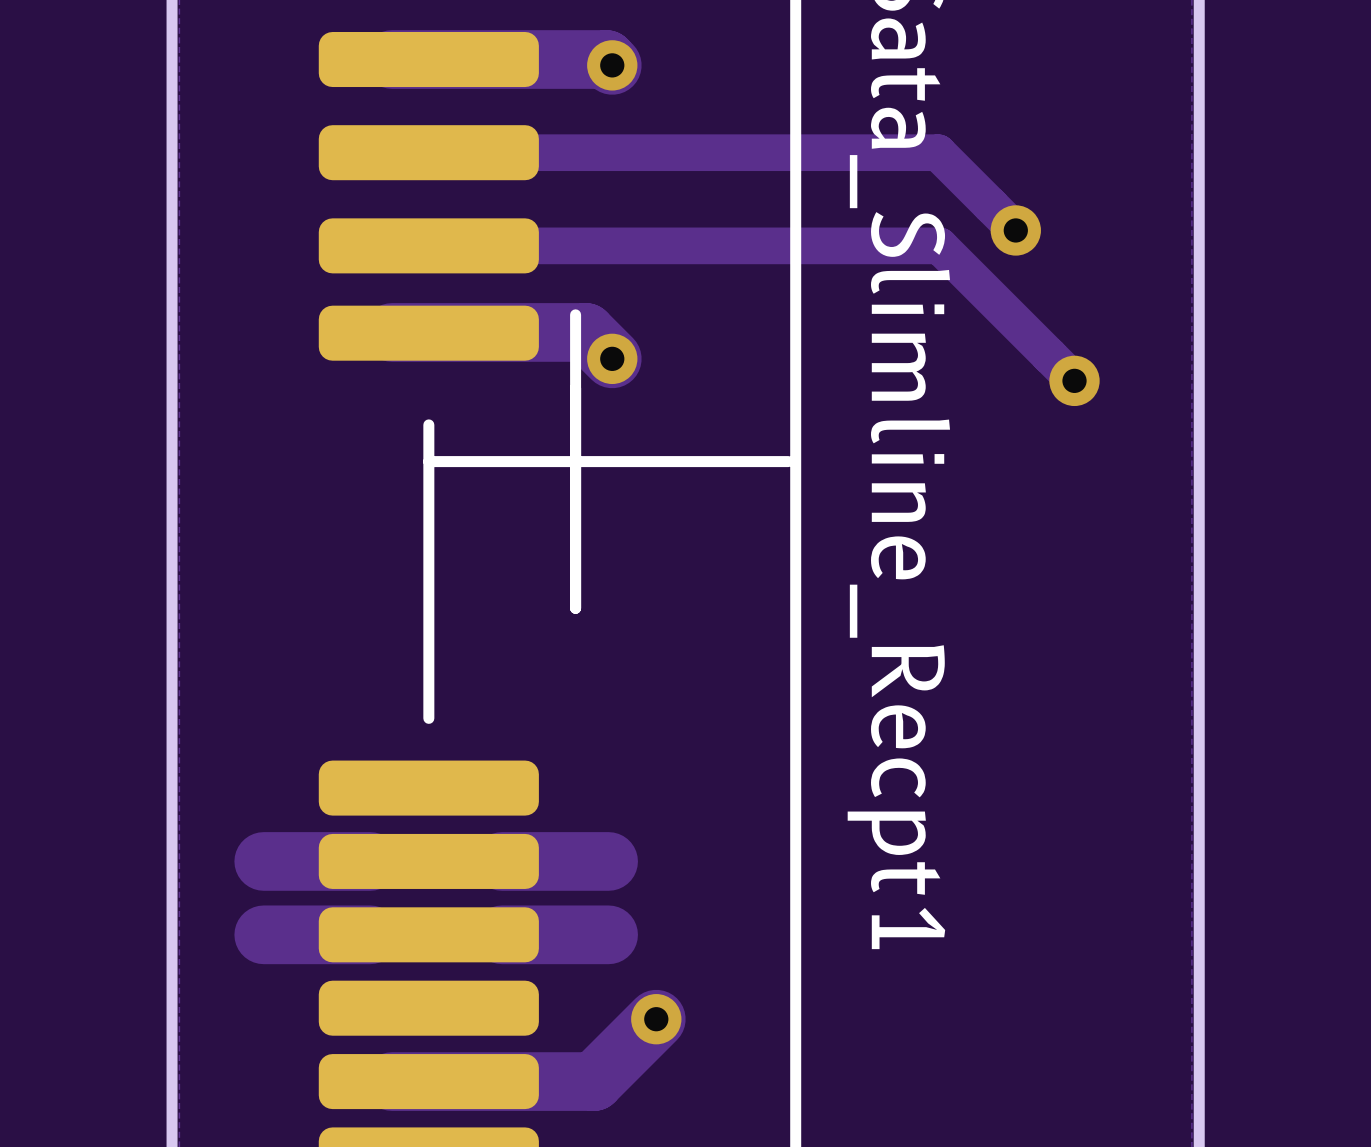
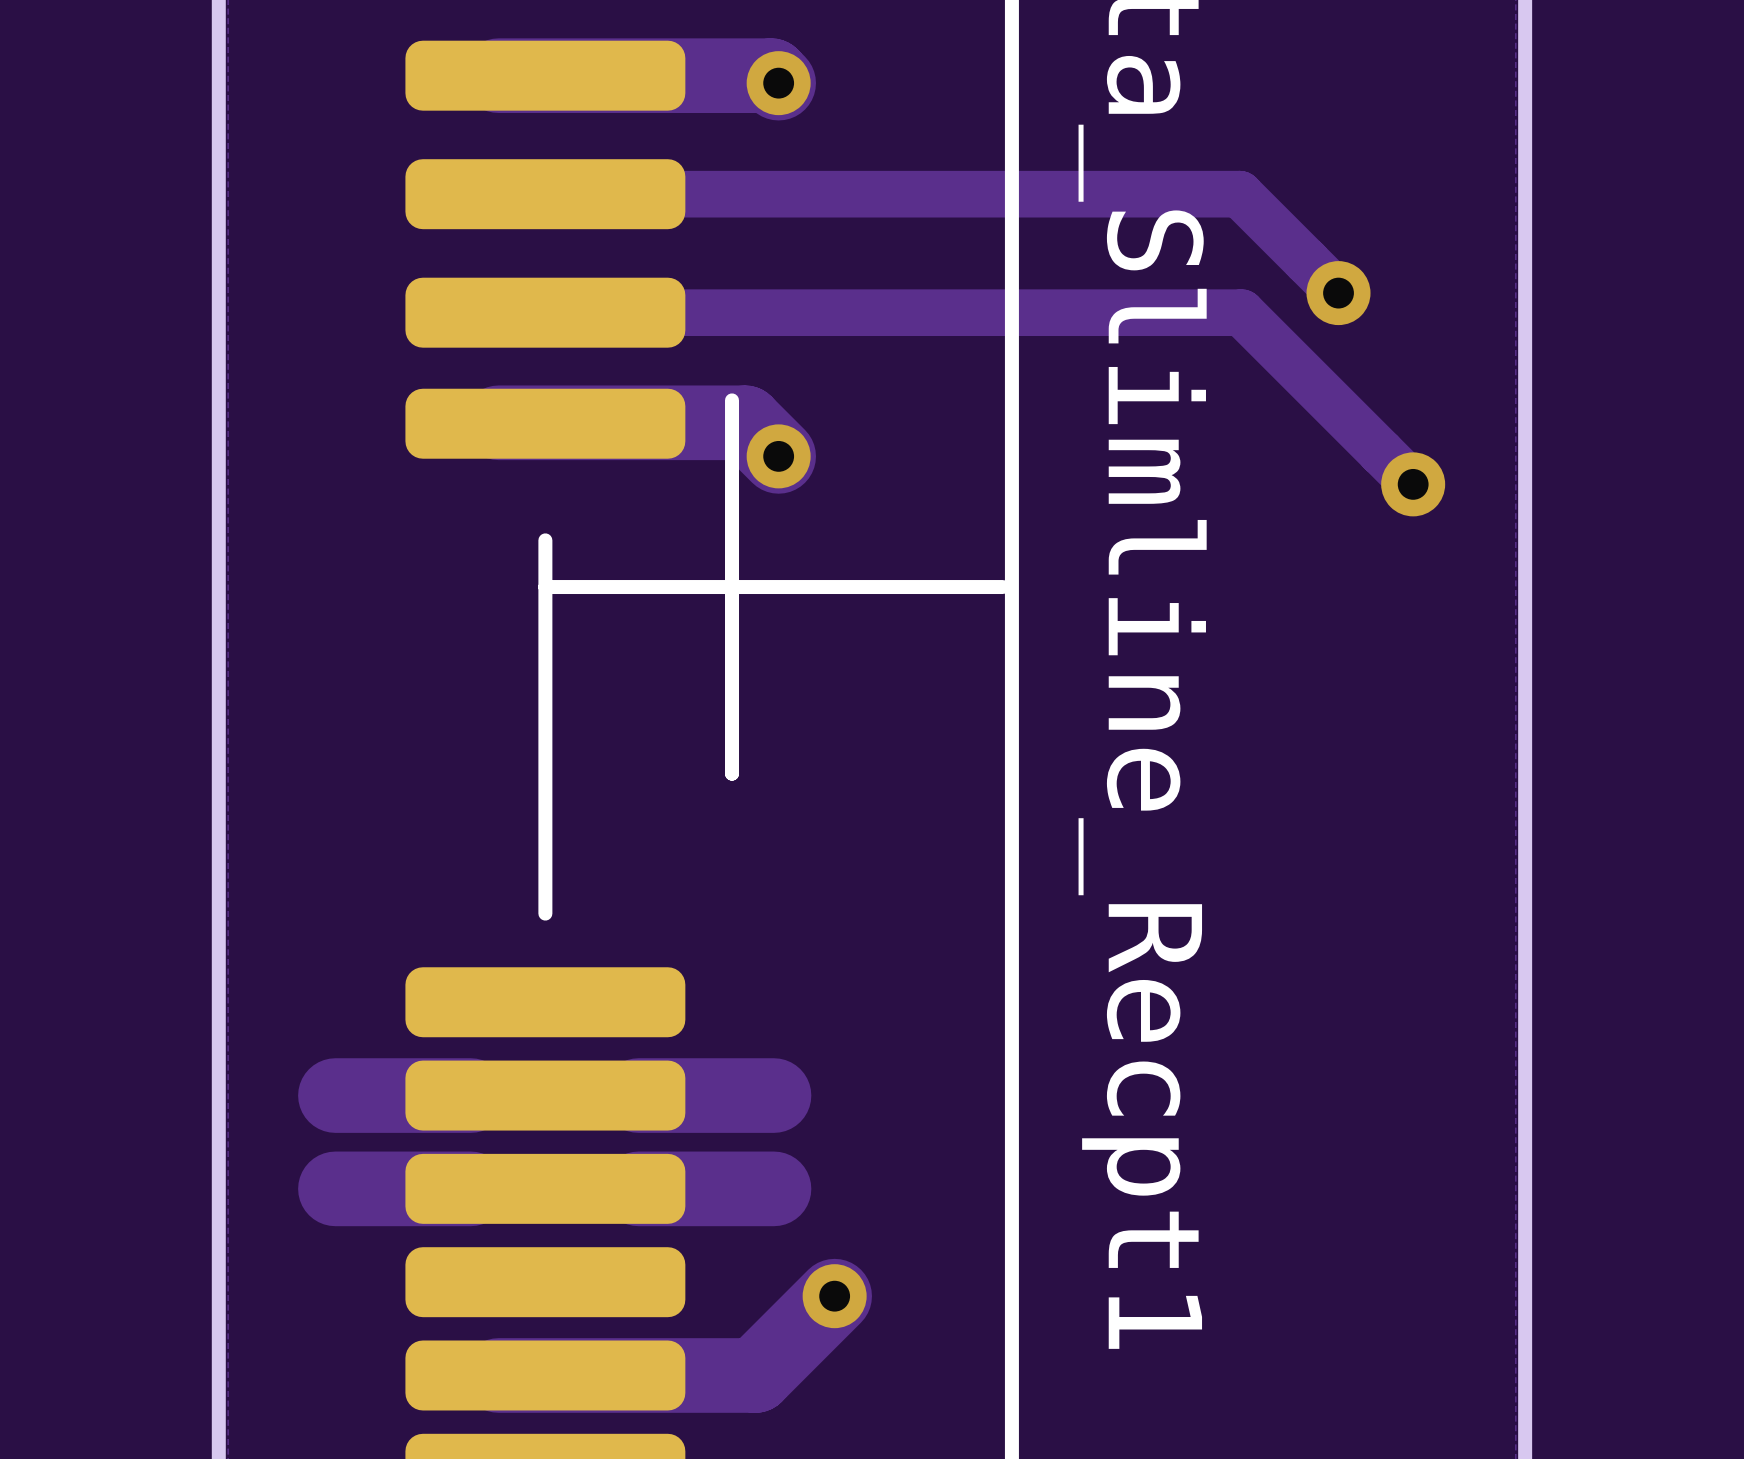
track: (938, 152) (1015, 230) -> (1192, 194) (1239, 194) (1338, 293)
via position: (1015, 230) -> (1338, 293)
track: (939, 245) (1074, 380) -> (1194, 312) (1241, 312) (1413, 484)
via position: (1074, 380) -> (1413, 484)

